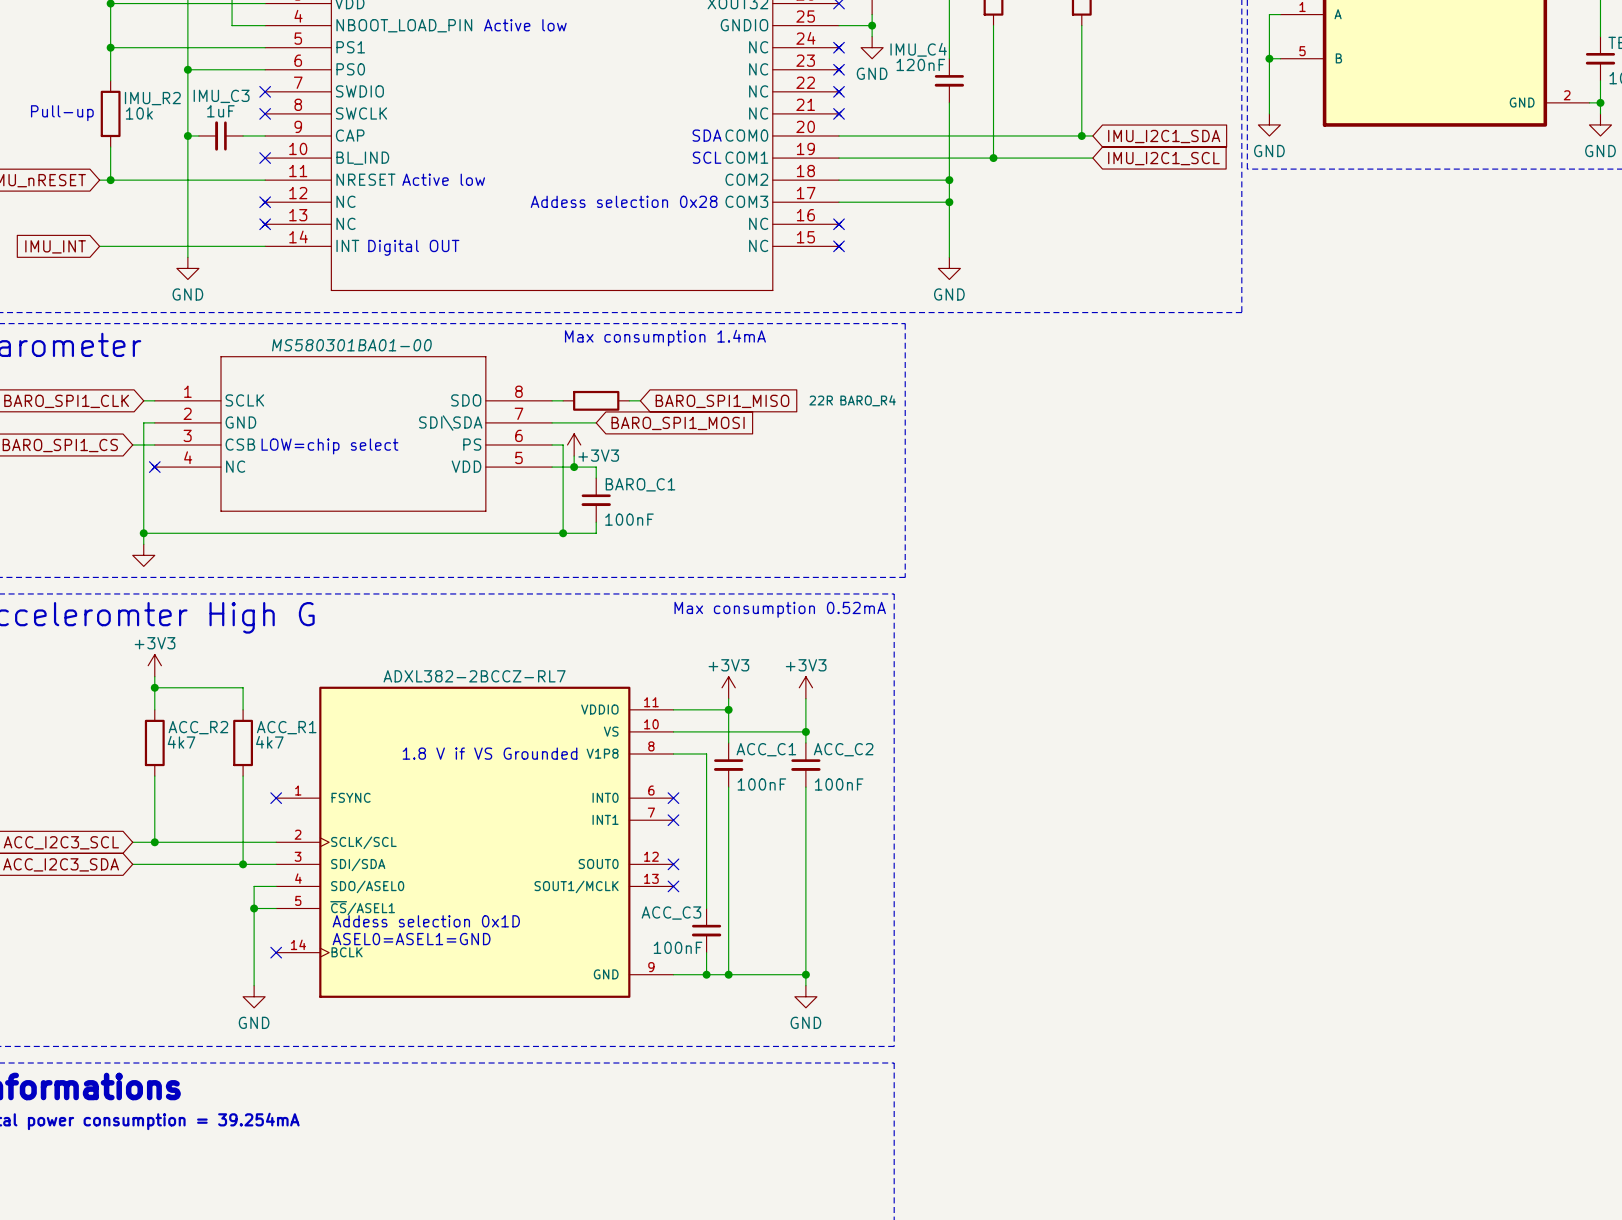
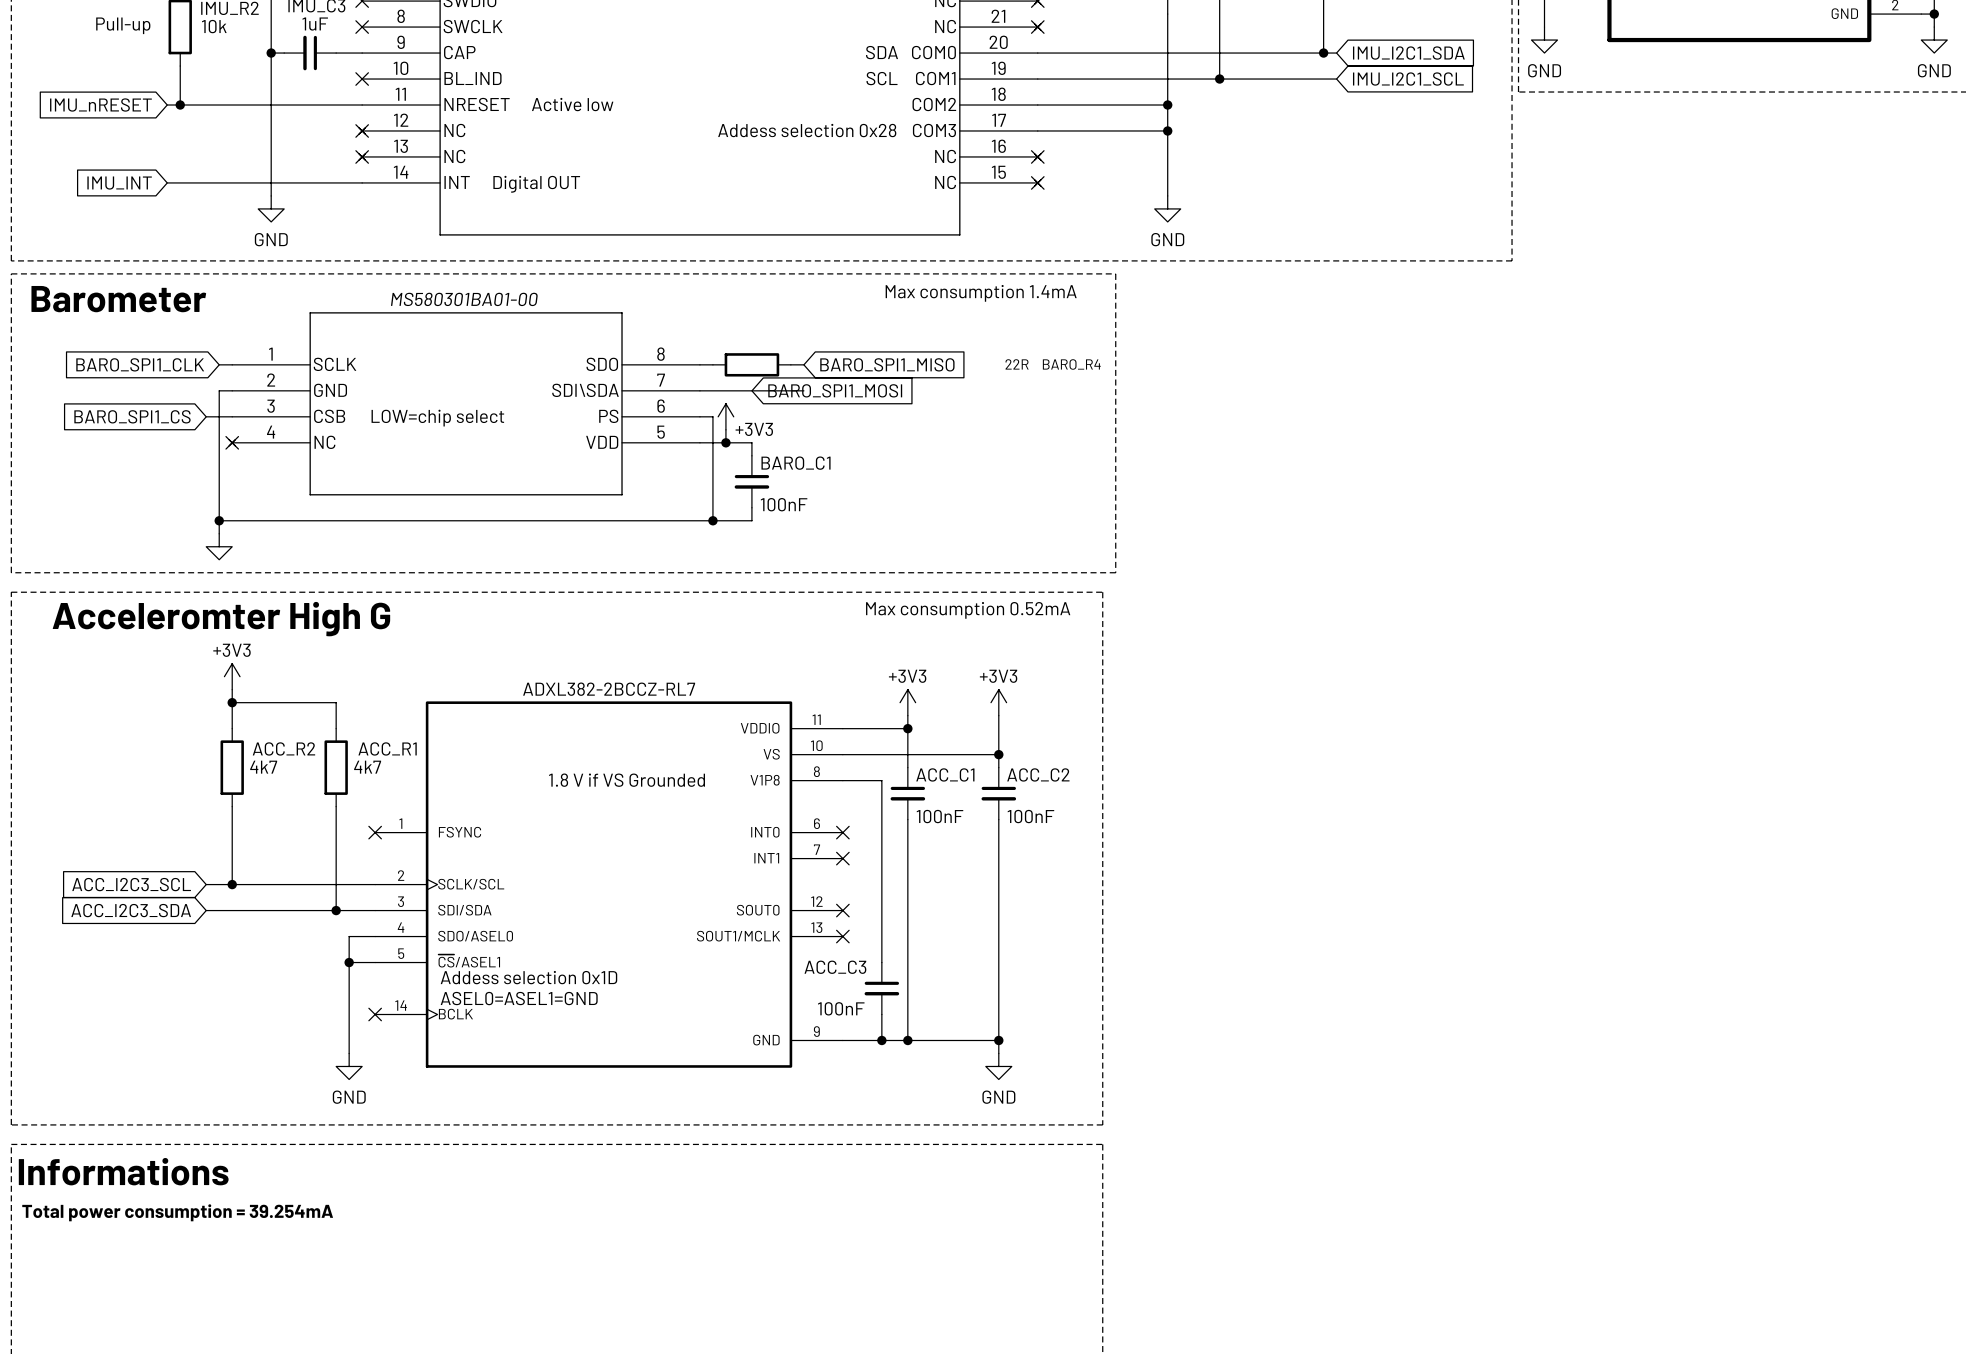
text position: Max consumption 1.4mA (665, 338) -> Max consumption 1.4mA (981, 293)
wire: none -> (751, 390) (803, 390)

